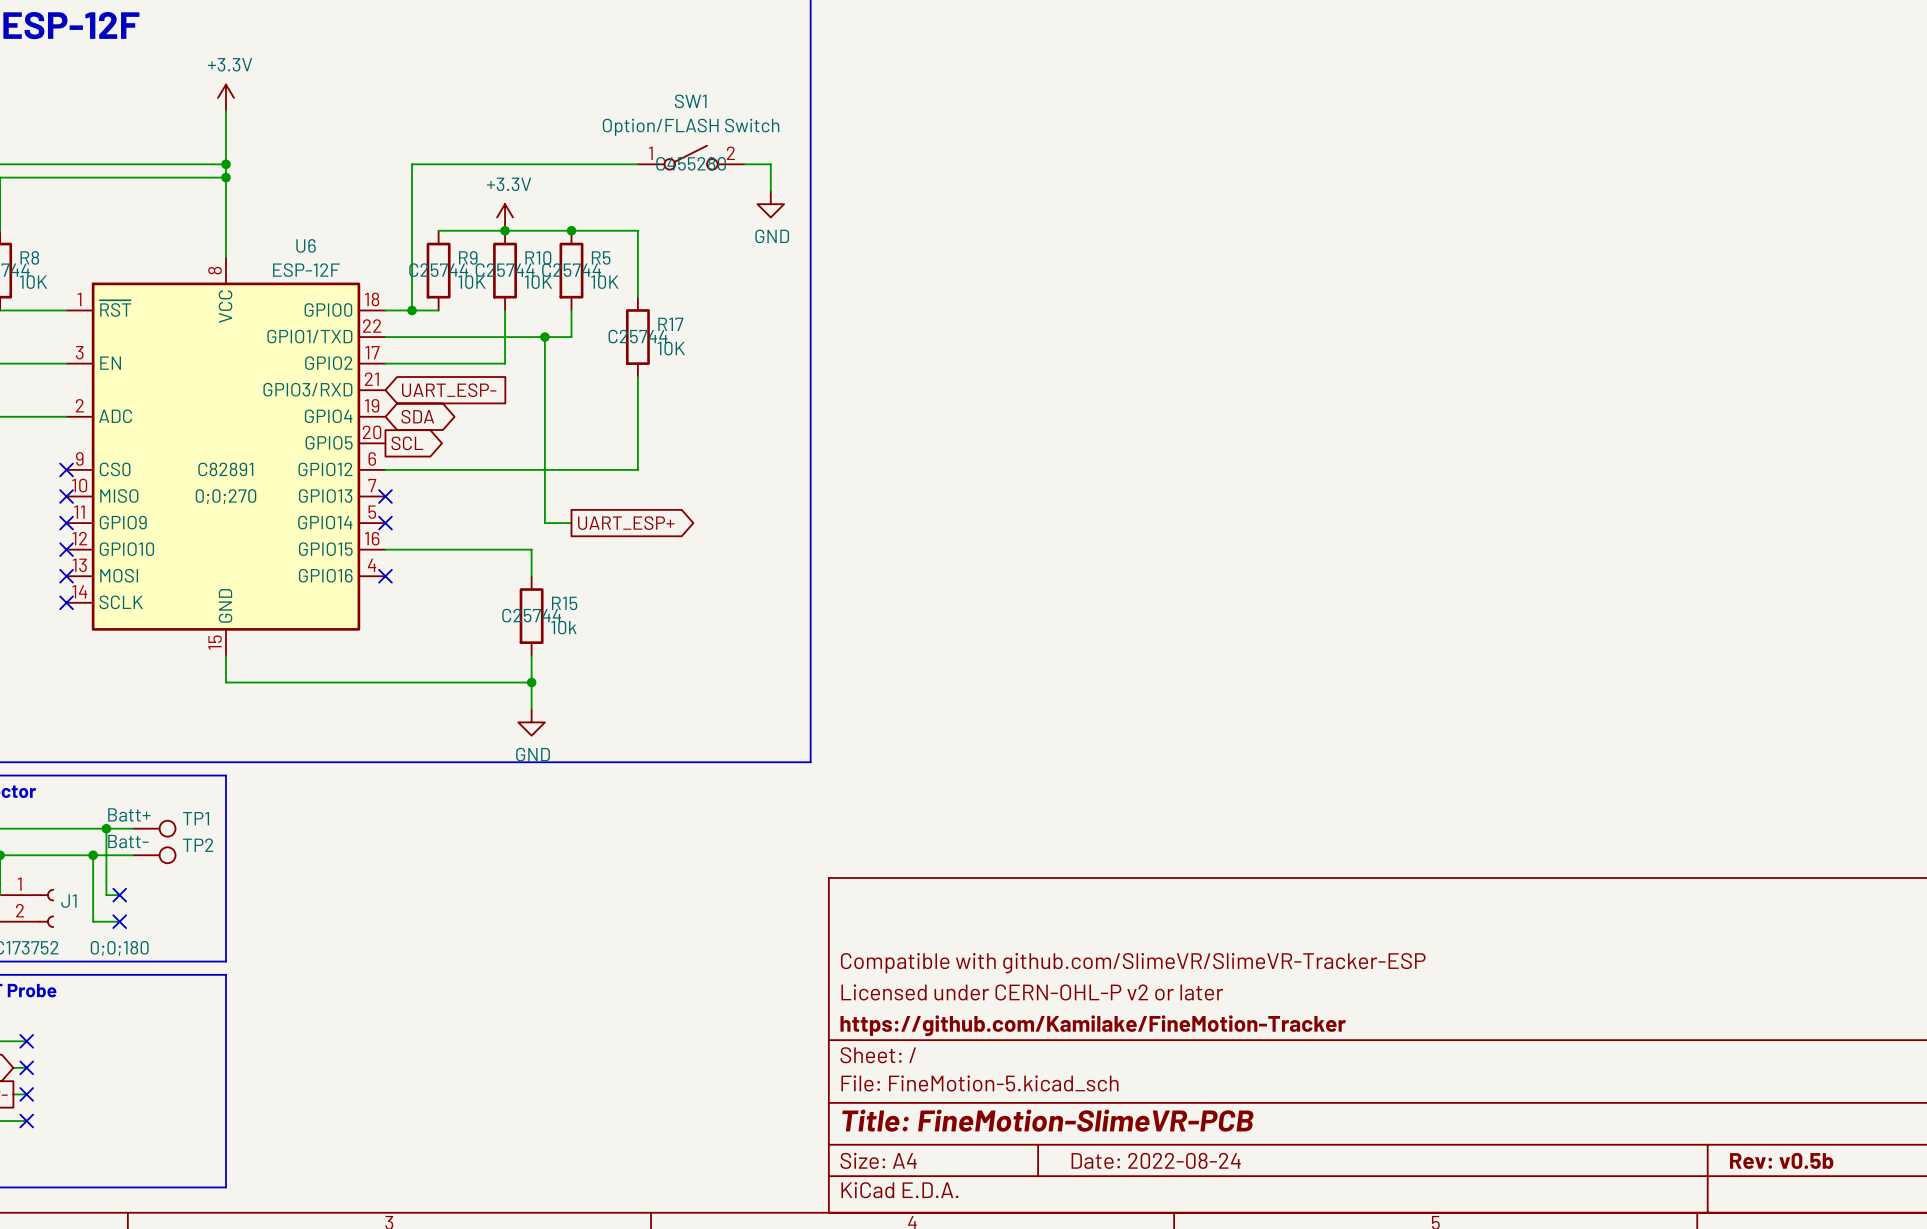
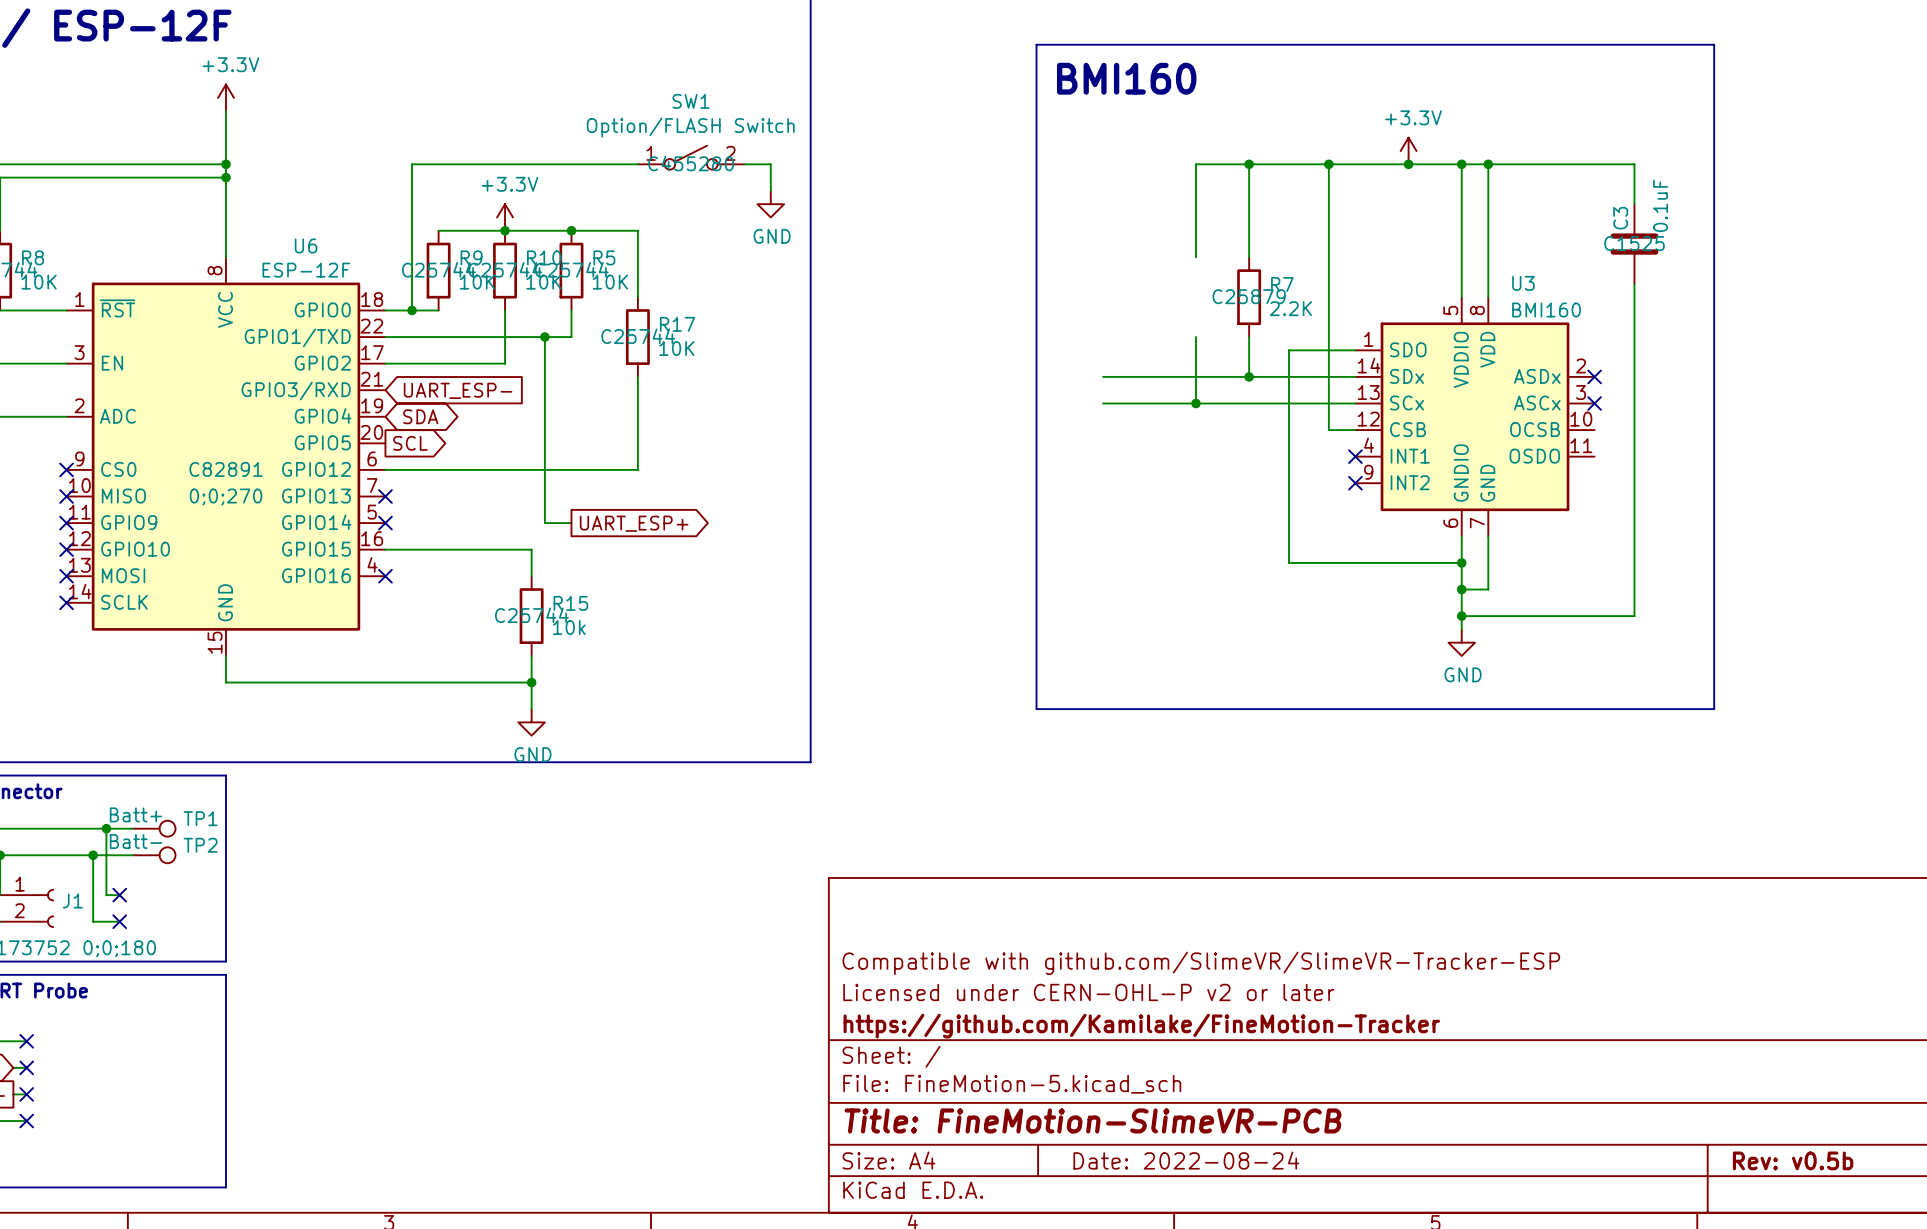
line: none -> (1036, 44) (1714, 44) (1714, 709) (1036, 709) (1036, 44)
text: none -> BMI160 (1126, 78)
power symbol: none -> +3.3V (1408, 151)
wire: none -> (1249, 164) (1249, 257)
junction: none -> (1249, 164)
wire: none -> (1328, 164) (1328, 430) (1355, 430)
junction: none -> (1328, 164)
junction: none -> (1408, 164)
wire: none -> (1461, 164) (1461, 297)
junction: none -> (1461, 164)
wire: none -> (1488, 164) (1488, 297)
junction: none -> (1488, 164)
wire: none -> (1634, 204) (1634, 164) (1195, 164) (1195, 257)
C3: none -> 0.1uF (1634, 244)
wire: none -> (1634, 283) (1634, 616) (1461, 616)
R7: none -> 2.2K (1249, 297)
wire: none -> (1195, 337) (1195, 403)
wire: none -> (1249, 337) (1249, 376)
wire: none -> (1355, 350) (1288, 350) (1288, 562) (1461, 562)
wire: none -> (1102, 376) (1355, 376)
junction: none -> (1249, 376)
no-connect mark: none -> (1594, 376)
wire: none -> (1102, 403) (1355, 403)
junction: none -> (1195, 403)
no-connect mark: none -> (1594, 403)
U3: none -> BMI160 (1475, 416)
no-connect mark: none -> (1355, 456)
no-connect mark: none -> (1355, 483)
wire: none -> (1461, 536) (1461, 629)
wire: none -> (1488, 536) (1488, 589) (1461, 589)
junction: none -> (1461, 562)
junction: none -> (1461, 589)
junction: none -> (1461, 616)
power symbol: none -> GND (1461, 642)

